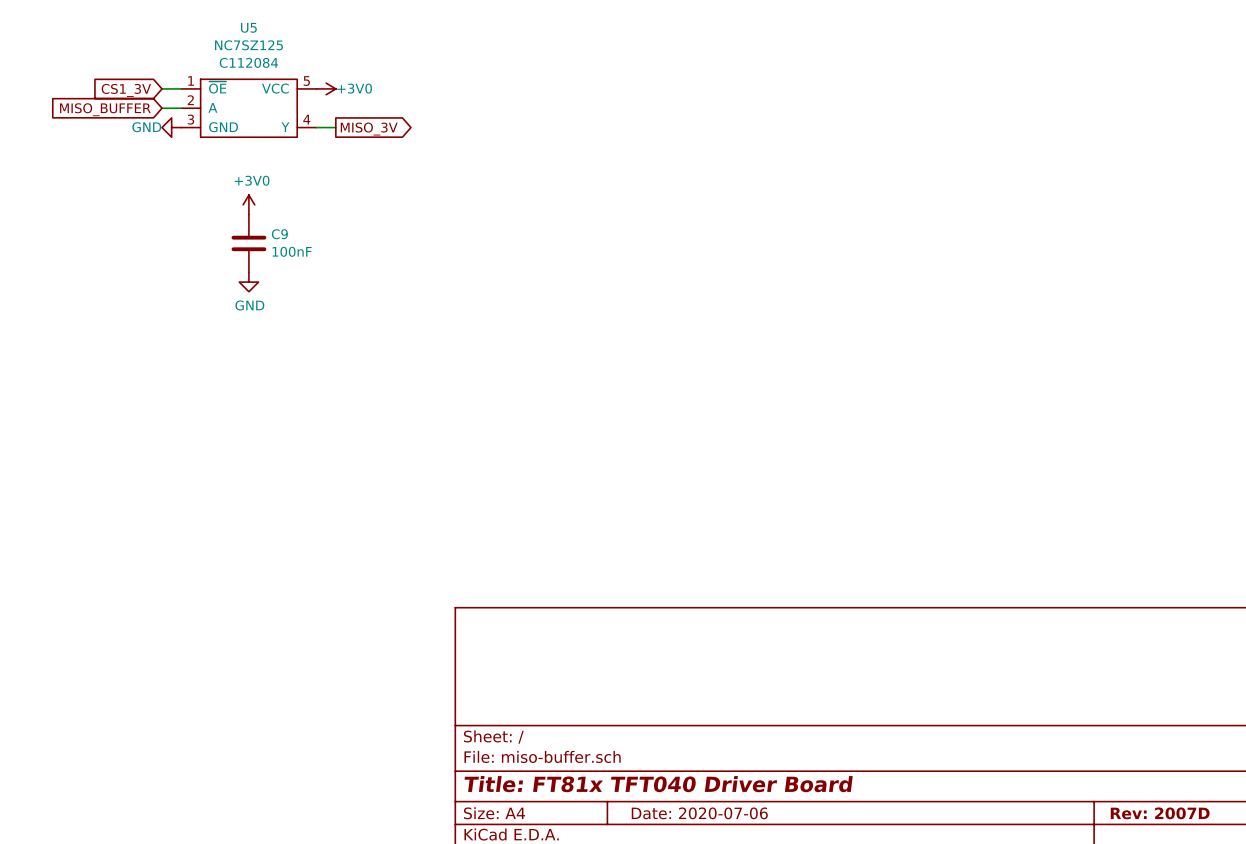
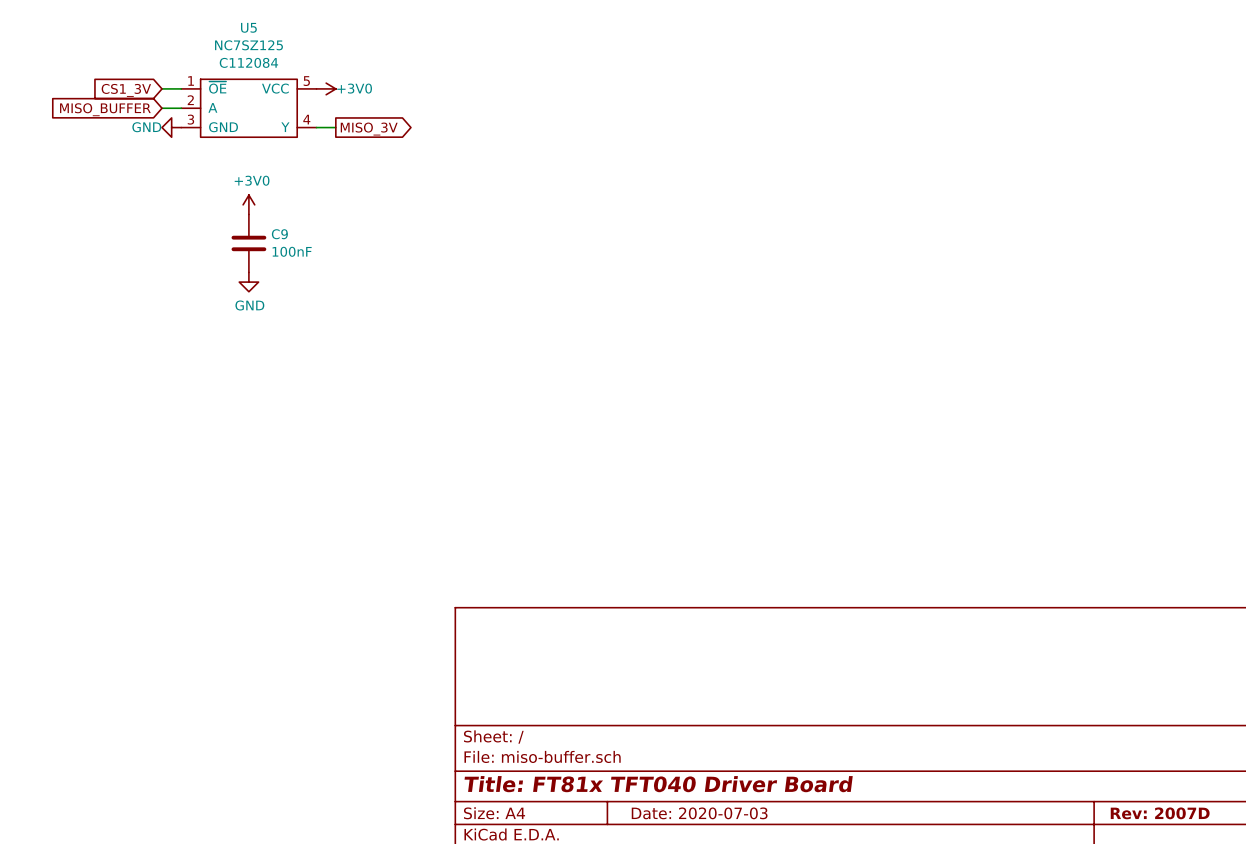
title block: Date: 2020-07-06 (699, 813) -> Date: 2020-07-03 (699, 813)

